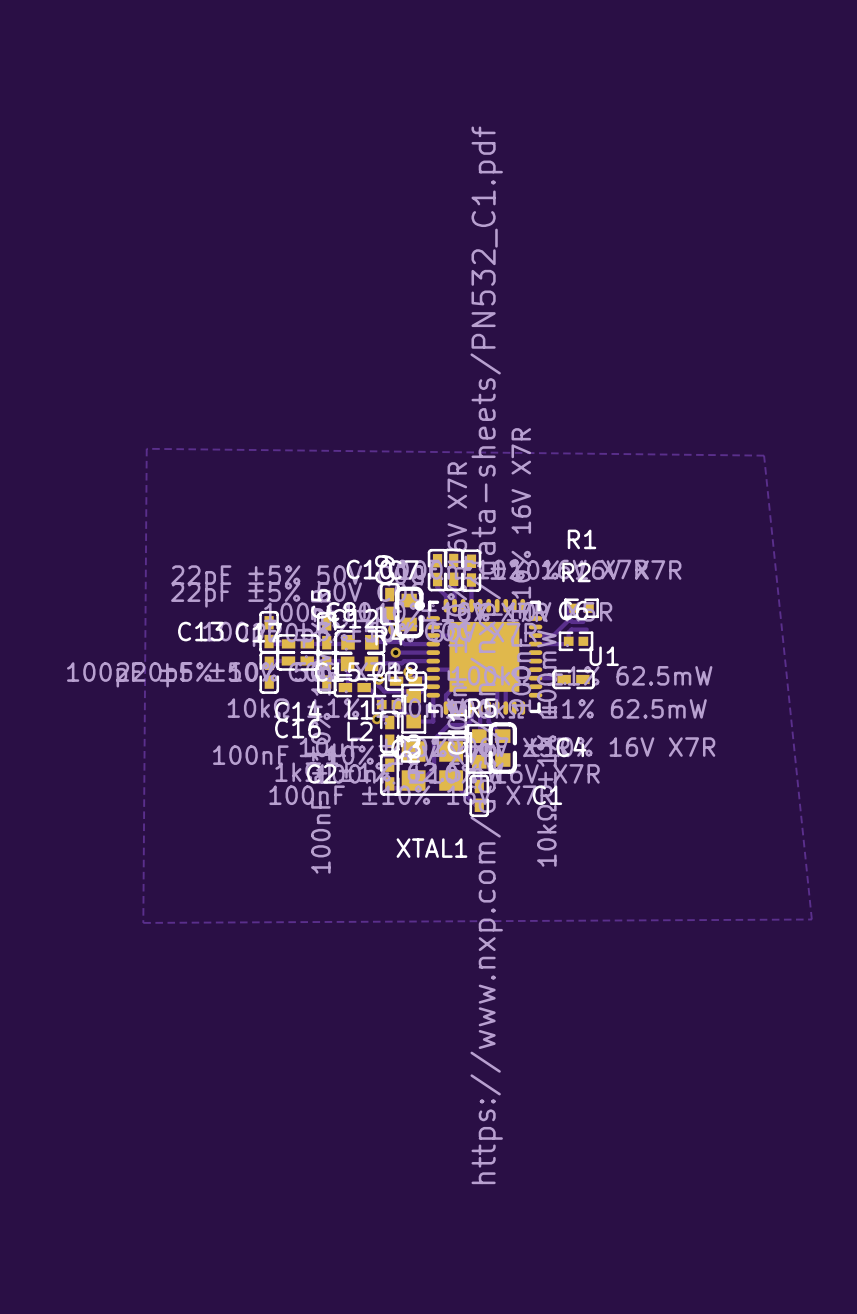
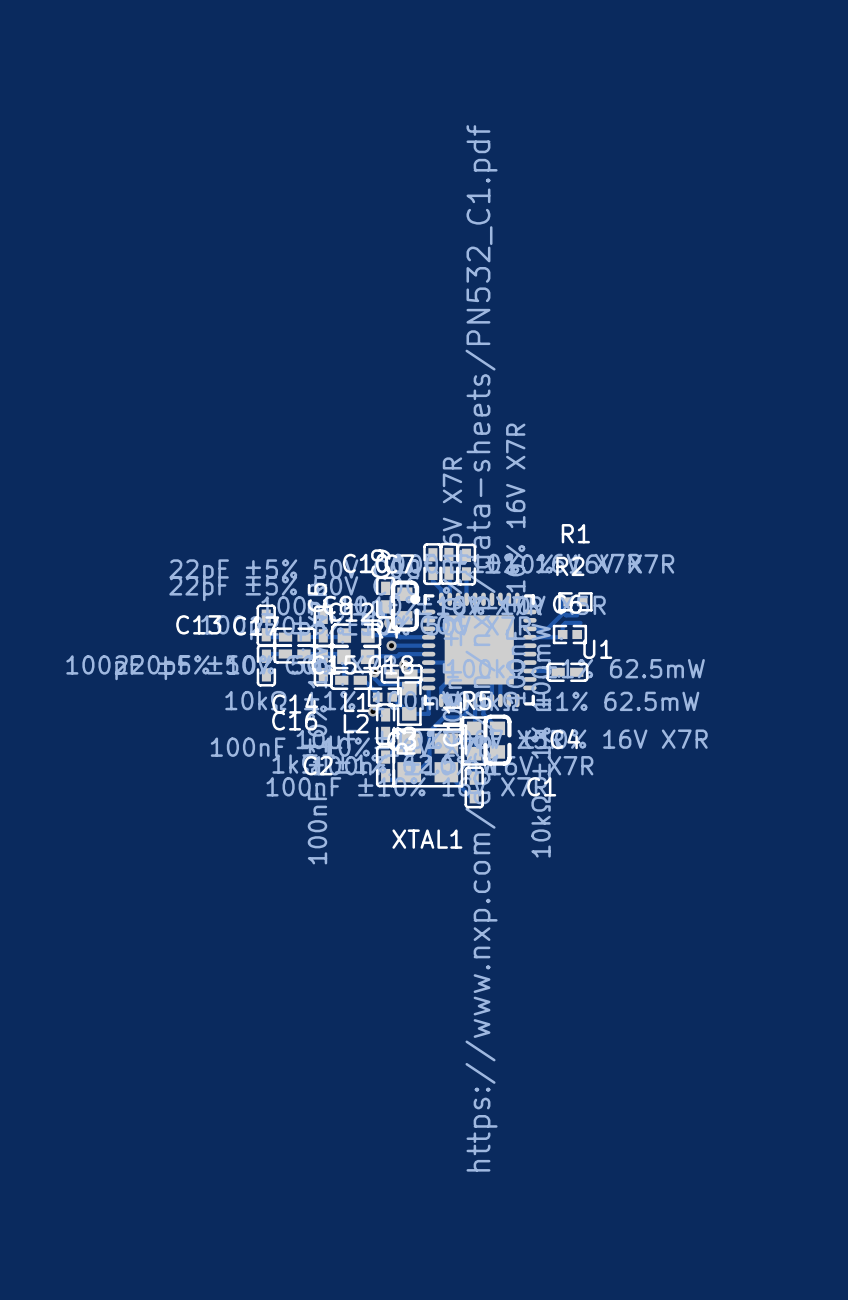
zone outline: (146, 448) (143, 922) (811, 919) (764, 455) (146, 448) -> none

